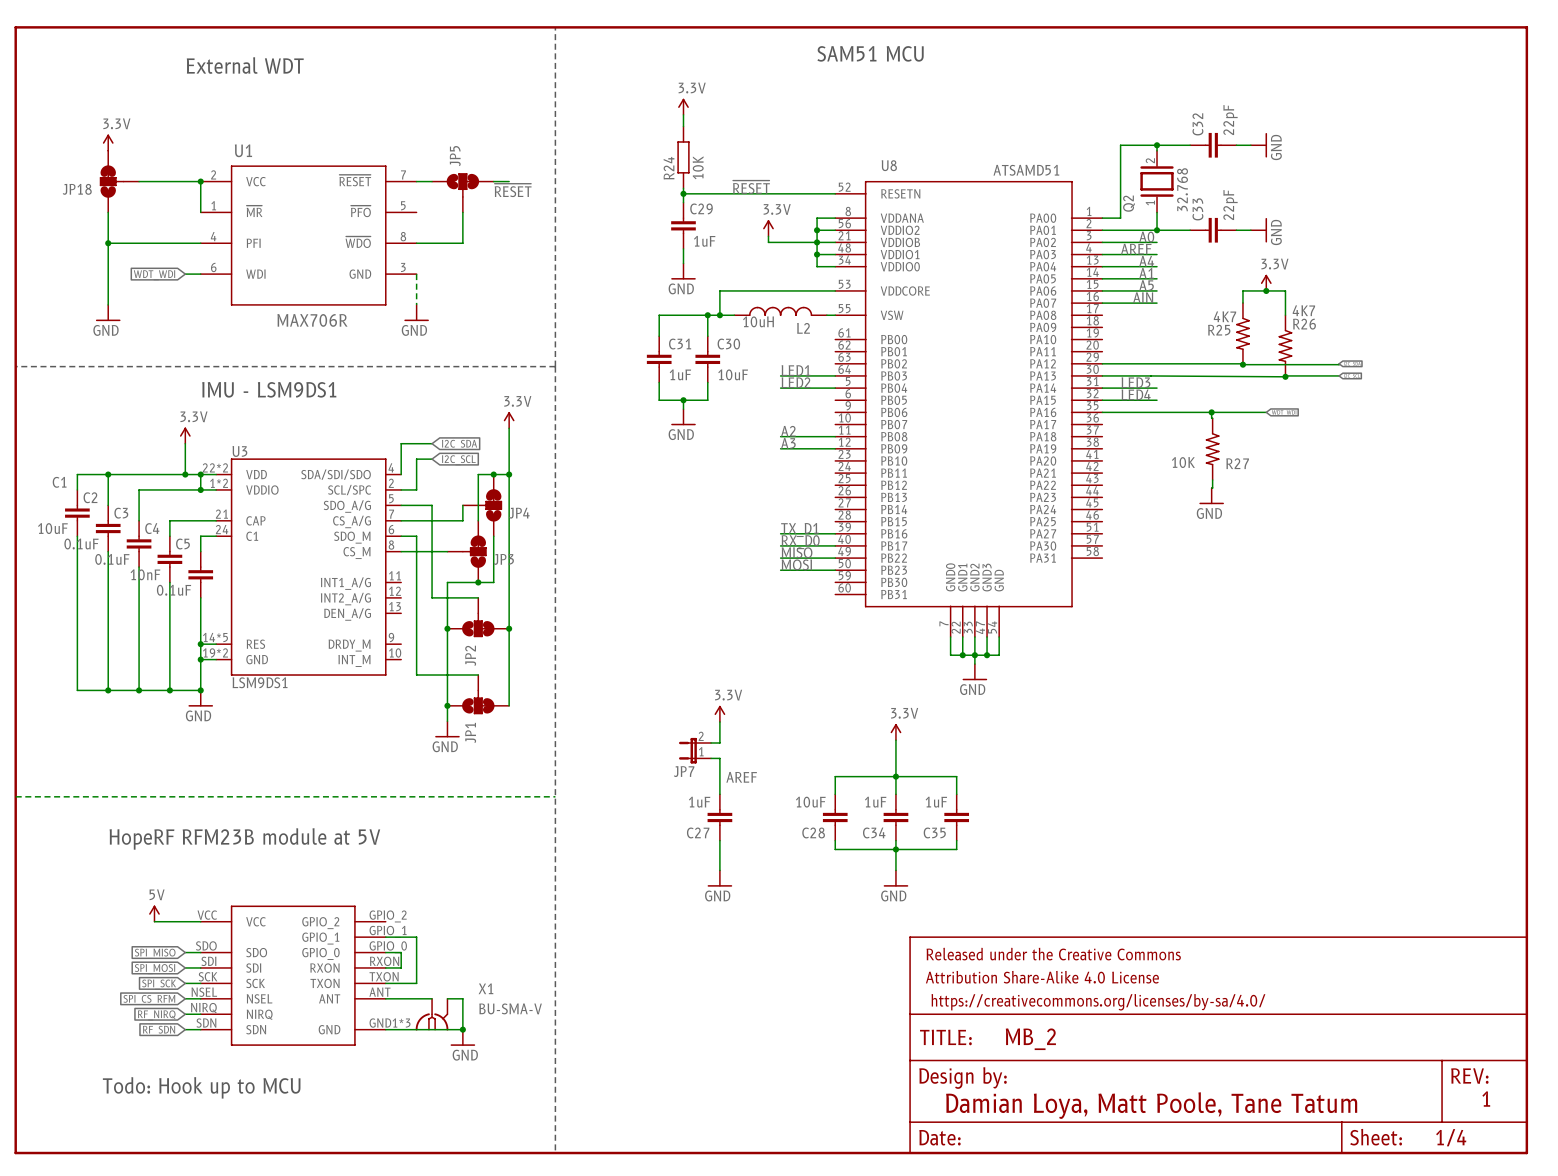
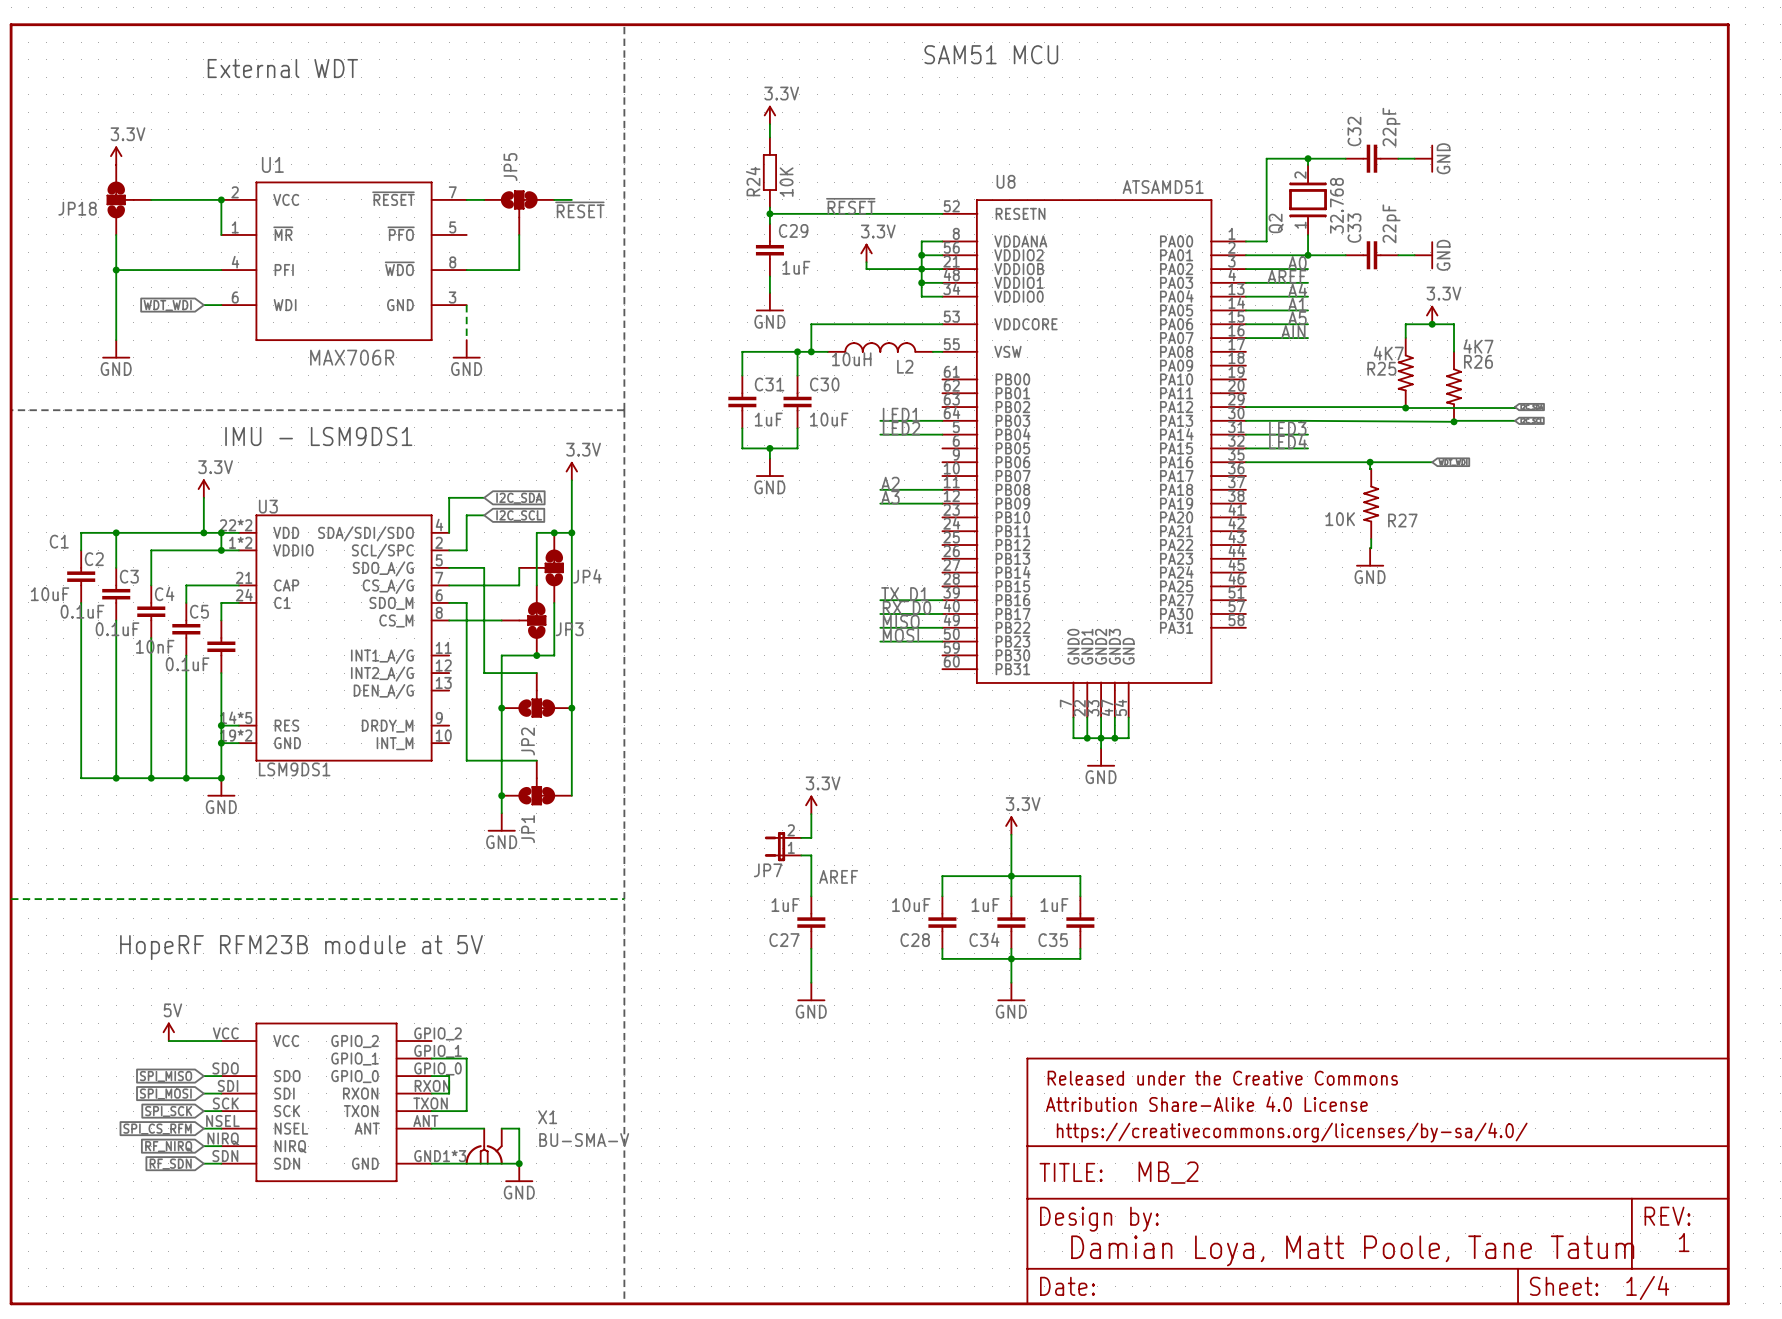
text: Todo: Hook up to MCU (201, 1087) -> none

